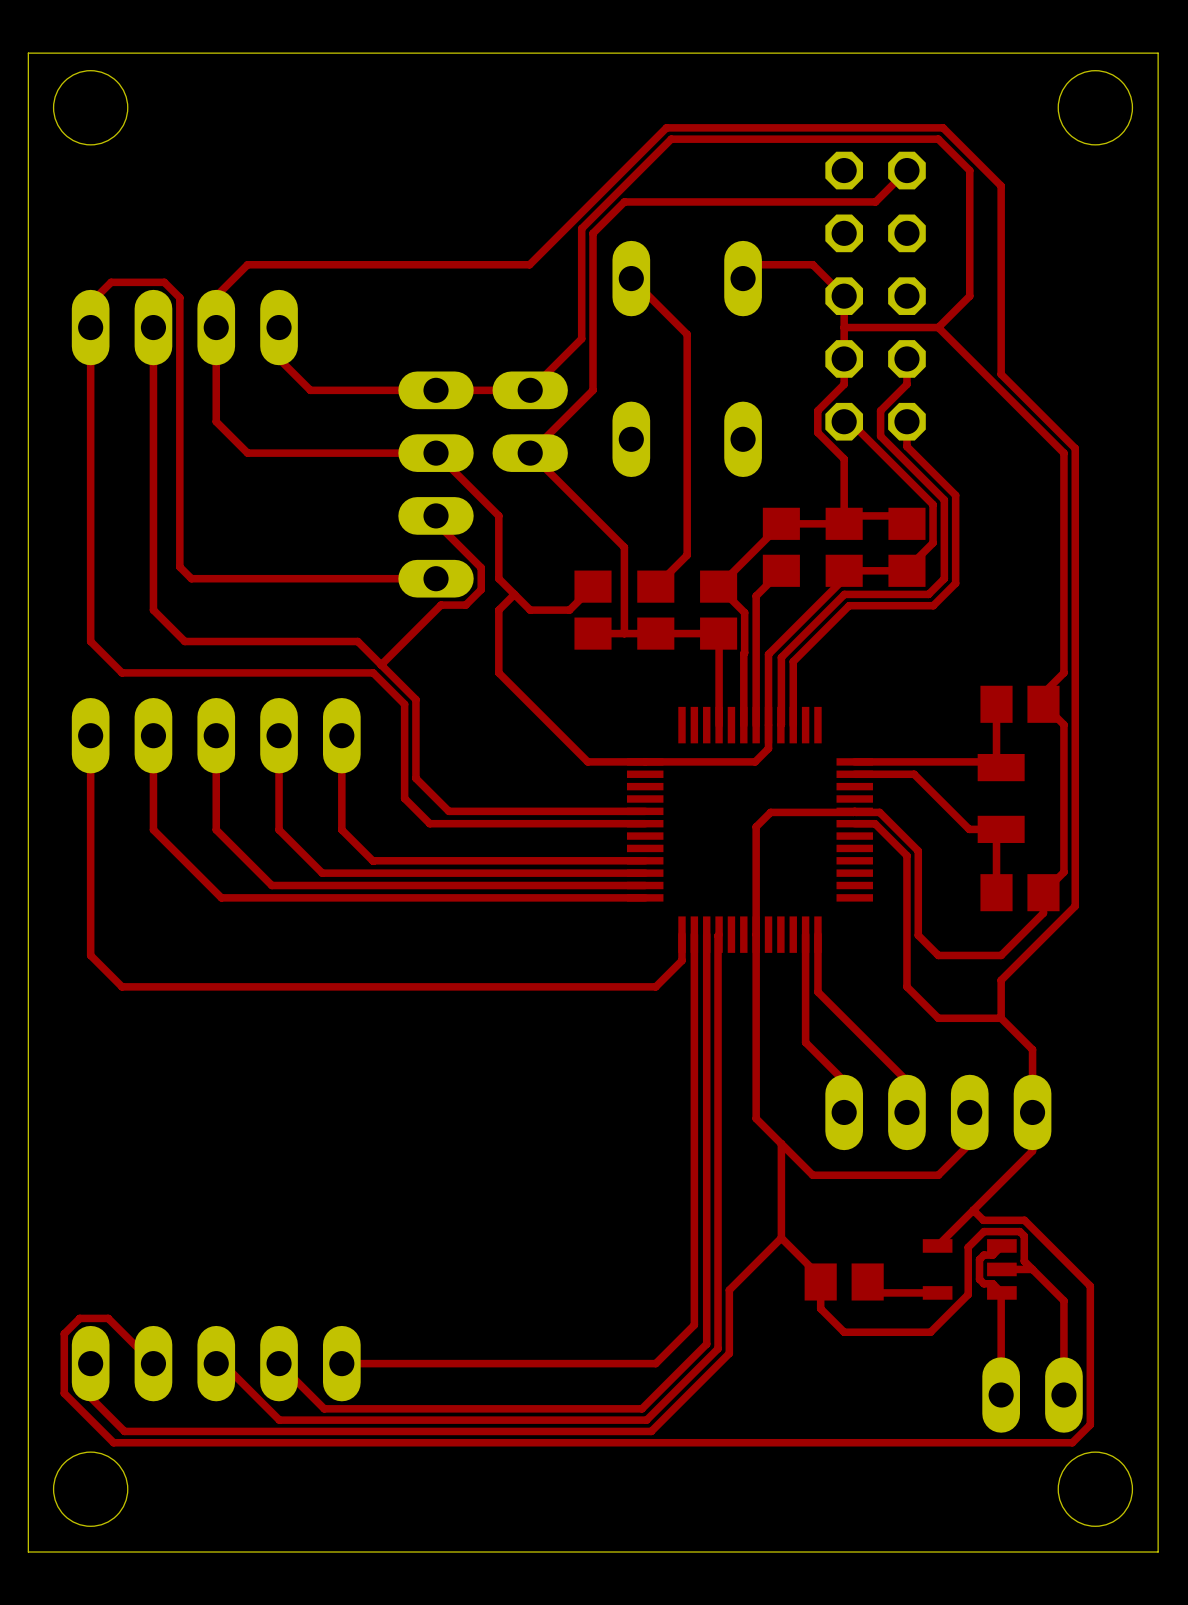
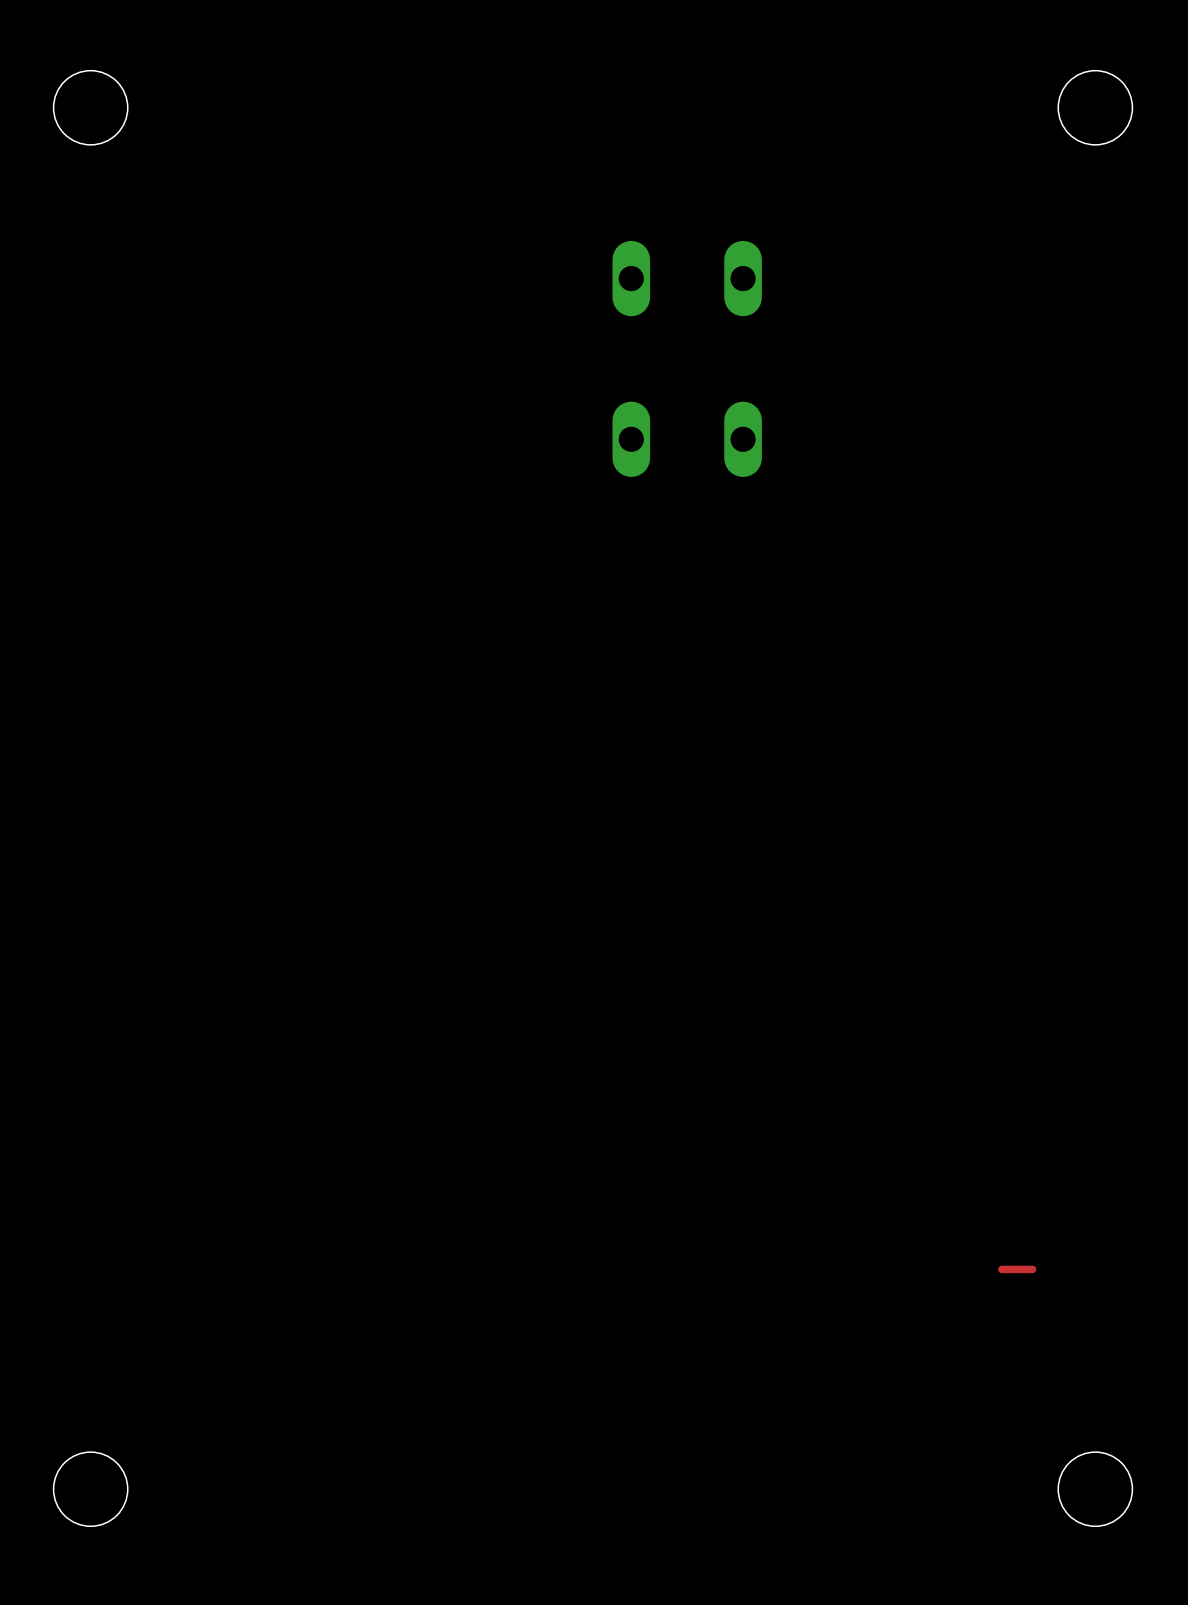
board edge: (1158, 53) (28, 53) (28, 1552) (1158, 1552) (1158, 53) -> none
top track: (906, 170) (875, 201) (624, 201) (593, 233) (593, 390) (530, 453) (624, 547) (624, 633) -> none
top track: (631, 278) (687, 334) (687, 555) (655, 586) -> none
top track: (743, 278) (756, 264) (812, 264) (844, 296) (844, 384) (817, 410) (817, 432) (844, 459) (844, 523) -> none
part: (875, 296) -> none
top track: (153, 327) (153, 610) (184, 641) (357, 641) (415, 699) (415, 778) (448, 811) (645, 811) -> none
part: (184, 327) -> none
top track: (938, 327) (969, 296) (969, 170) (938, 139) (671, 139) (581, 228) (581, 338) (530, 390) (310, 390) (279, 358) (279, 327) -> none
top track: (938, 327) (844, 327) -> none
top track: (938, 327) (1063, 453) (1063, 672) (1043, 693) (1043, 704) (1063, 724) (1063, 872) (1043, 892) (1043, 913) (1001, 955) (938, 955) (918, 935) (918, 851) (879, 812) (770, 812) (756, 826) (756, 1118) (812, 1175) (938, 1175) (969, 1143) (969, 1112) -> none
top track: (906, 358) (906, 384) (880, 410) (880, 436) (944, 499) (944, 578) (928, 594) (844, 594) (781, 657) (780, 725) -> none
part: (530, 421) -> none
top track: (844, 421) (850, 421) (933, 504) (933, 543) (906, 570) (844, 570) (844, 578) (768, 654) (768, 748) (755, 761) (587, 761) (498, 672) (498, 610) (514, 594) -> none
top track: (906, 421) (906, 446) (955, 495) (955, 583) (933, 605) (849, 605) (793, 661) (793, 725) -> none
part: (436, 484) -> none
top track: (436, 515) (436, 522) (481, 567) (481, 589) (465, 605) (441, 605) (381, 664) -> none
top track: (906, 523) (899, 515) (844, 515) (836, 523) (781, 523) (718, 586) (744, 612) (743, 725) -> none
part: (781, 547) -> none
part: (844, 547) -> none
part: (906, 547) -> none
top track: (781, 570) (756, 596) (756, 725) -> none
top track: (436, 578) (191, 578) (179, 567) (179, 297) (164, 282) (111, 282) (90, 302) (90, 641) (122, 672) (373, 672) (404, 704) (404, 798) (429, 823) (645, 823) -> none
top track: (593, 586) (569, 610) (530, 610) (498, 578) (498, 515) (436, 453) (247, 453) (216, 421) (216, 296) (247, 264) (529, 264) (666, 127) (943, 127) (1001, 185) (1001, 374) (1075, 448) (1075, 906) (1001, 980) (1001, 1018) -> none
part: (593, 610) -> none
part: (655, 610) -> none
part: (718, 610) -> none
top track: (593, 633) (718, 633) (719, 725) -> none
top track: (996, 704) (996, 762) -> none
part: (1019, 704) -> none
top track: (90, 735) (90, 955) (122, 986) (655, 986) (682, 960) (682, 934) -> none
top track: (153, 735) (153, 829) (221, 897) (645, 897) -> none
top track: (216, 735) (216, 829) (271, 885) (645, 885) -> none
part: (216, 735) -> none
top track: (279, 735) (279, 829) (322, 873) (645, 873) -> none
top track: (341, 735) (341, 829) (373, 861) (645, 860) -> none
top track: (854, 761) (995, 761) (1001, 767) -> none
top track: (854, 774) (914, 774) (969, 829) (1001, 829) (996, 834) (996, 892) -> none
part: (1001, 798) -> none
top track: (854, 823) (874, 823) (906, 855) (906, 986) (938, 1018) (1001, 1018) -> none
part: (749, 829) -> none
part: (1019, 892) -> none
top track: (694, 934) (694, 1325) (655, 1363) (341, 1363) -> none
top track: (706, 934) (706, 1344) (641, 1408) (324, 1408) (279, 1363) -> none
top track: (719, 934) (718, 1348) (646, 1420) (279, 1420) (222, 1363) (216, 1363) -> none
top track: (805, 934) (805, 1042) (844, 1081) (844, 1112) -> none
top track: (817, 934) (817, 992) (906, 1081) (906, 1112) -> none
top track: (1001, 1018) (1032, 1049) (1032, 1151) (937, 1245) -> none
part: (938, 1112) -> none
top track: (781, 1143) (781, 1238) -> none
top track: (973, 1210) (983, 1220) (1024, 1220) (1090, 1286) (1090, 1424) (1072, 1442) (113, 1442) (64, 1393) (64, 1333) (79, 1318) (108, 1318) (153, 1363) -> none
top track: (781, 1238) (820, 1277) (820, 1308) (844, 1332) (930, 1332) (968, 1294) (968, 1247) (983, 1231) (1019, 1231) (1024, 1236) (1024, 1261) (1063, 1300) (1063, 1395) -> none
top track: (781, 1238) (729, 1290) (729, 1353) (651, 1431) (124, 1431) (90, 1397) (90, 1363) -> none
top track: (1001, 1245) (992, 1255) (983, 1255) (979, 1259) (979, 1279) (983, 1283) (992, 1283) (1001, 1292) (1001, 1395) -> none
part: (969, 1269) -> none
part: (844, 1281) -> none
top track: (867, 1281) (878, 1292) (937, 1292) -> none
part: (216, 1363) -> none
part: (1032, 1395) -> none

